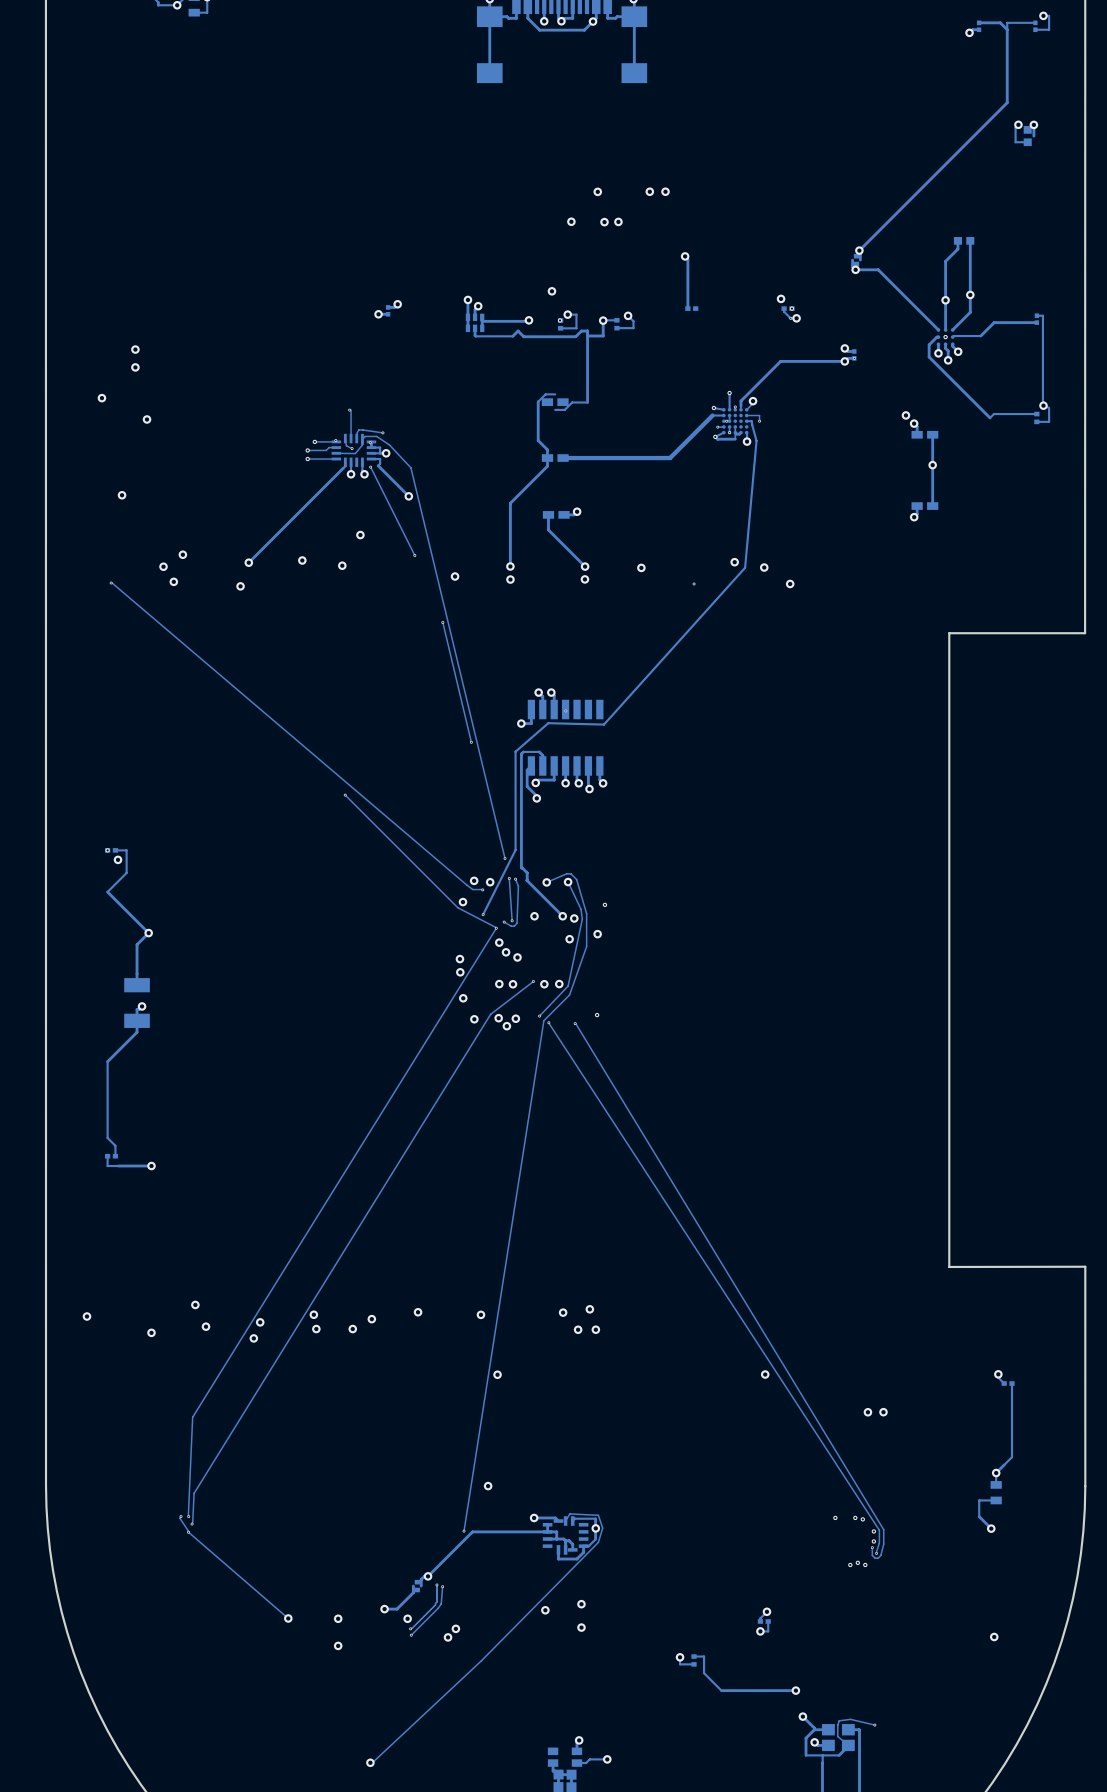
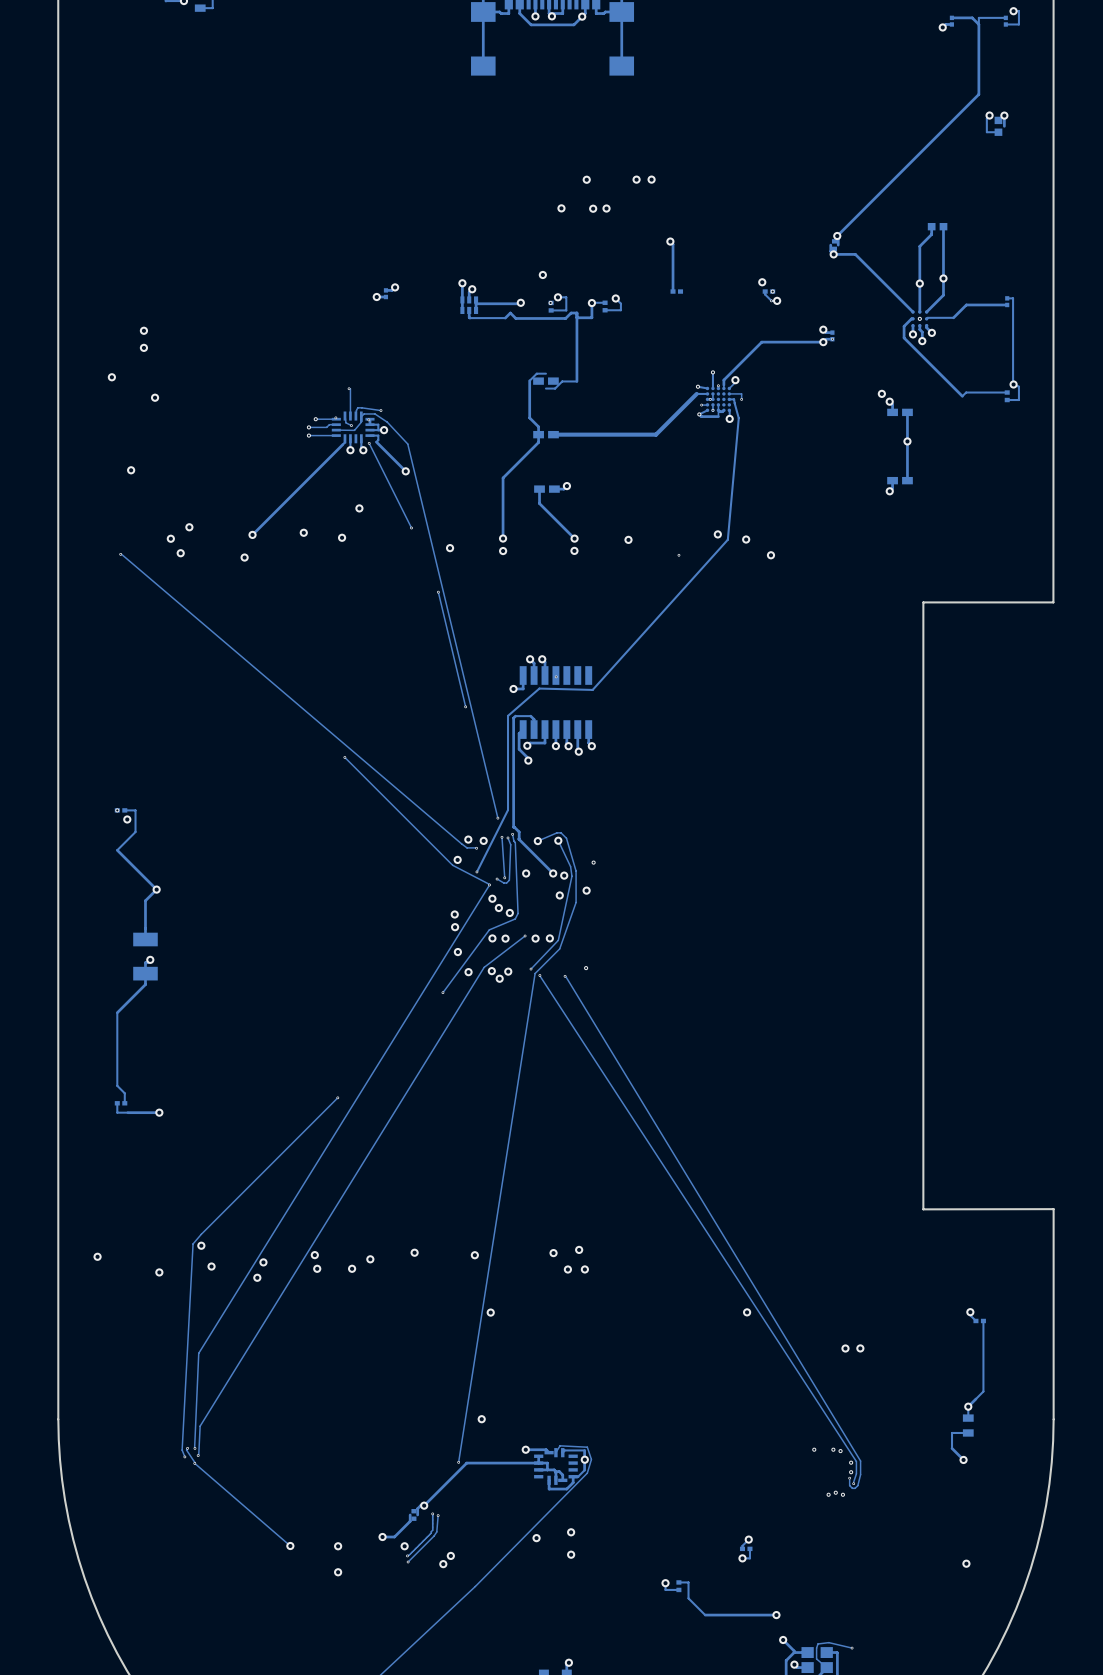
track: none -> (512, 834) (515, 842) (518, 913) (515, 918) (489, 929) (442, 992)
via: none -> (512, 834)
via: none -> (442, 992)
track: none -> (337, 1097) (193, 1243) (182, 1450) (184, 1456)
via: none -> (337, 1097)
via: none -> (184, 1456)

